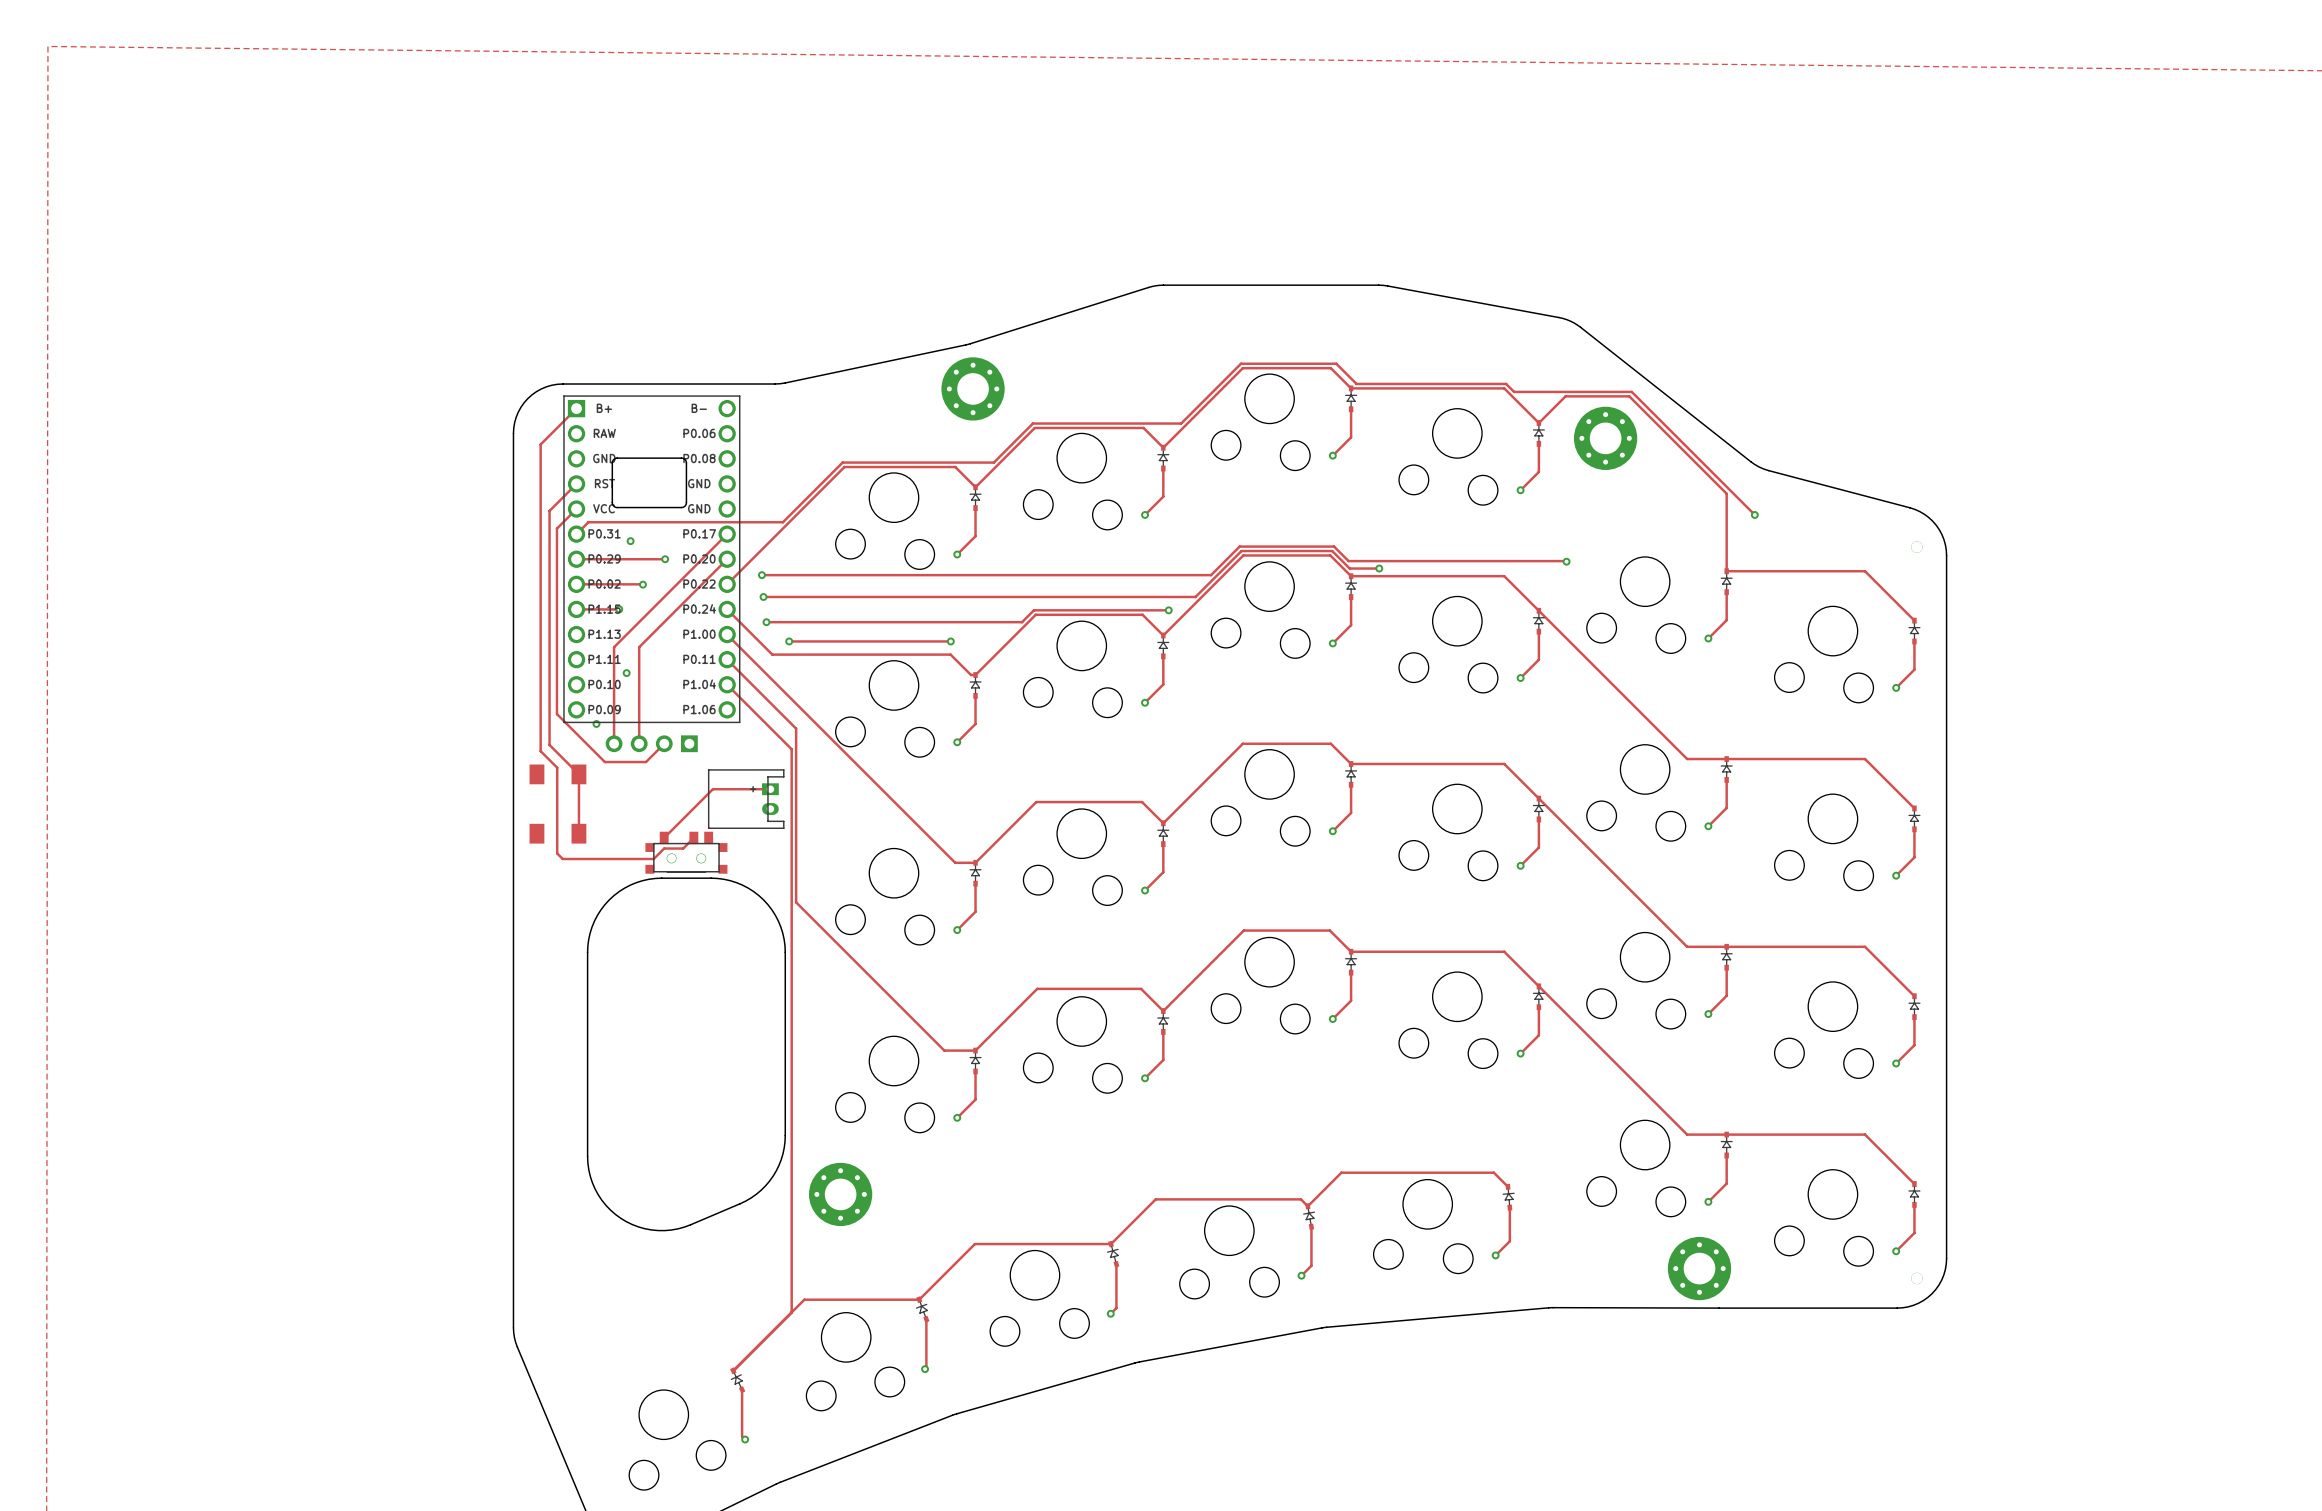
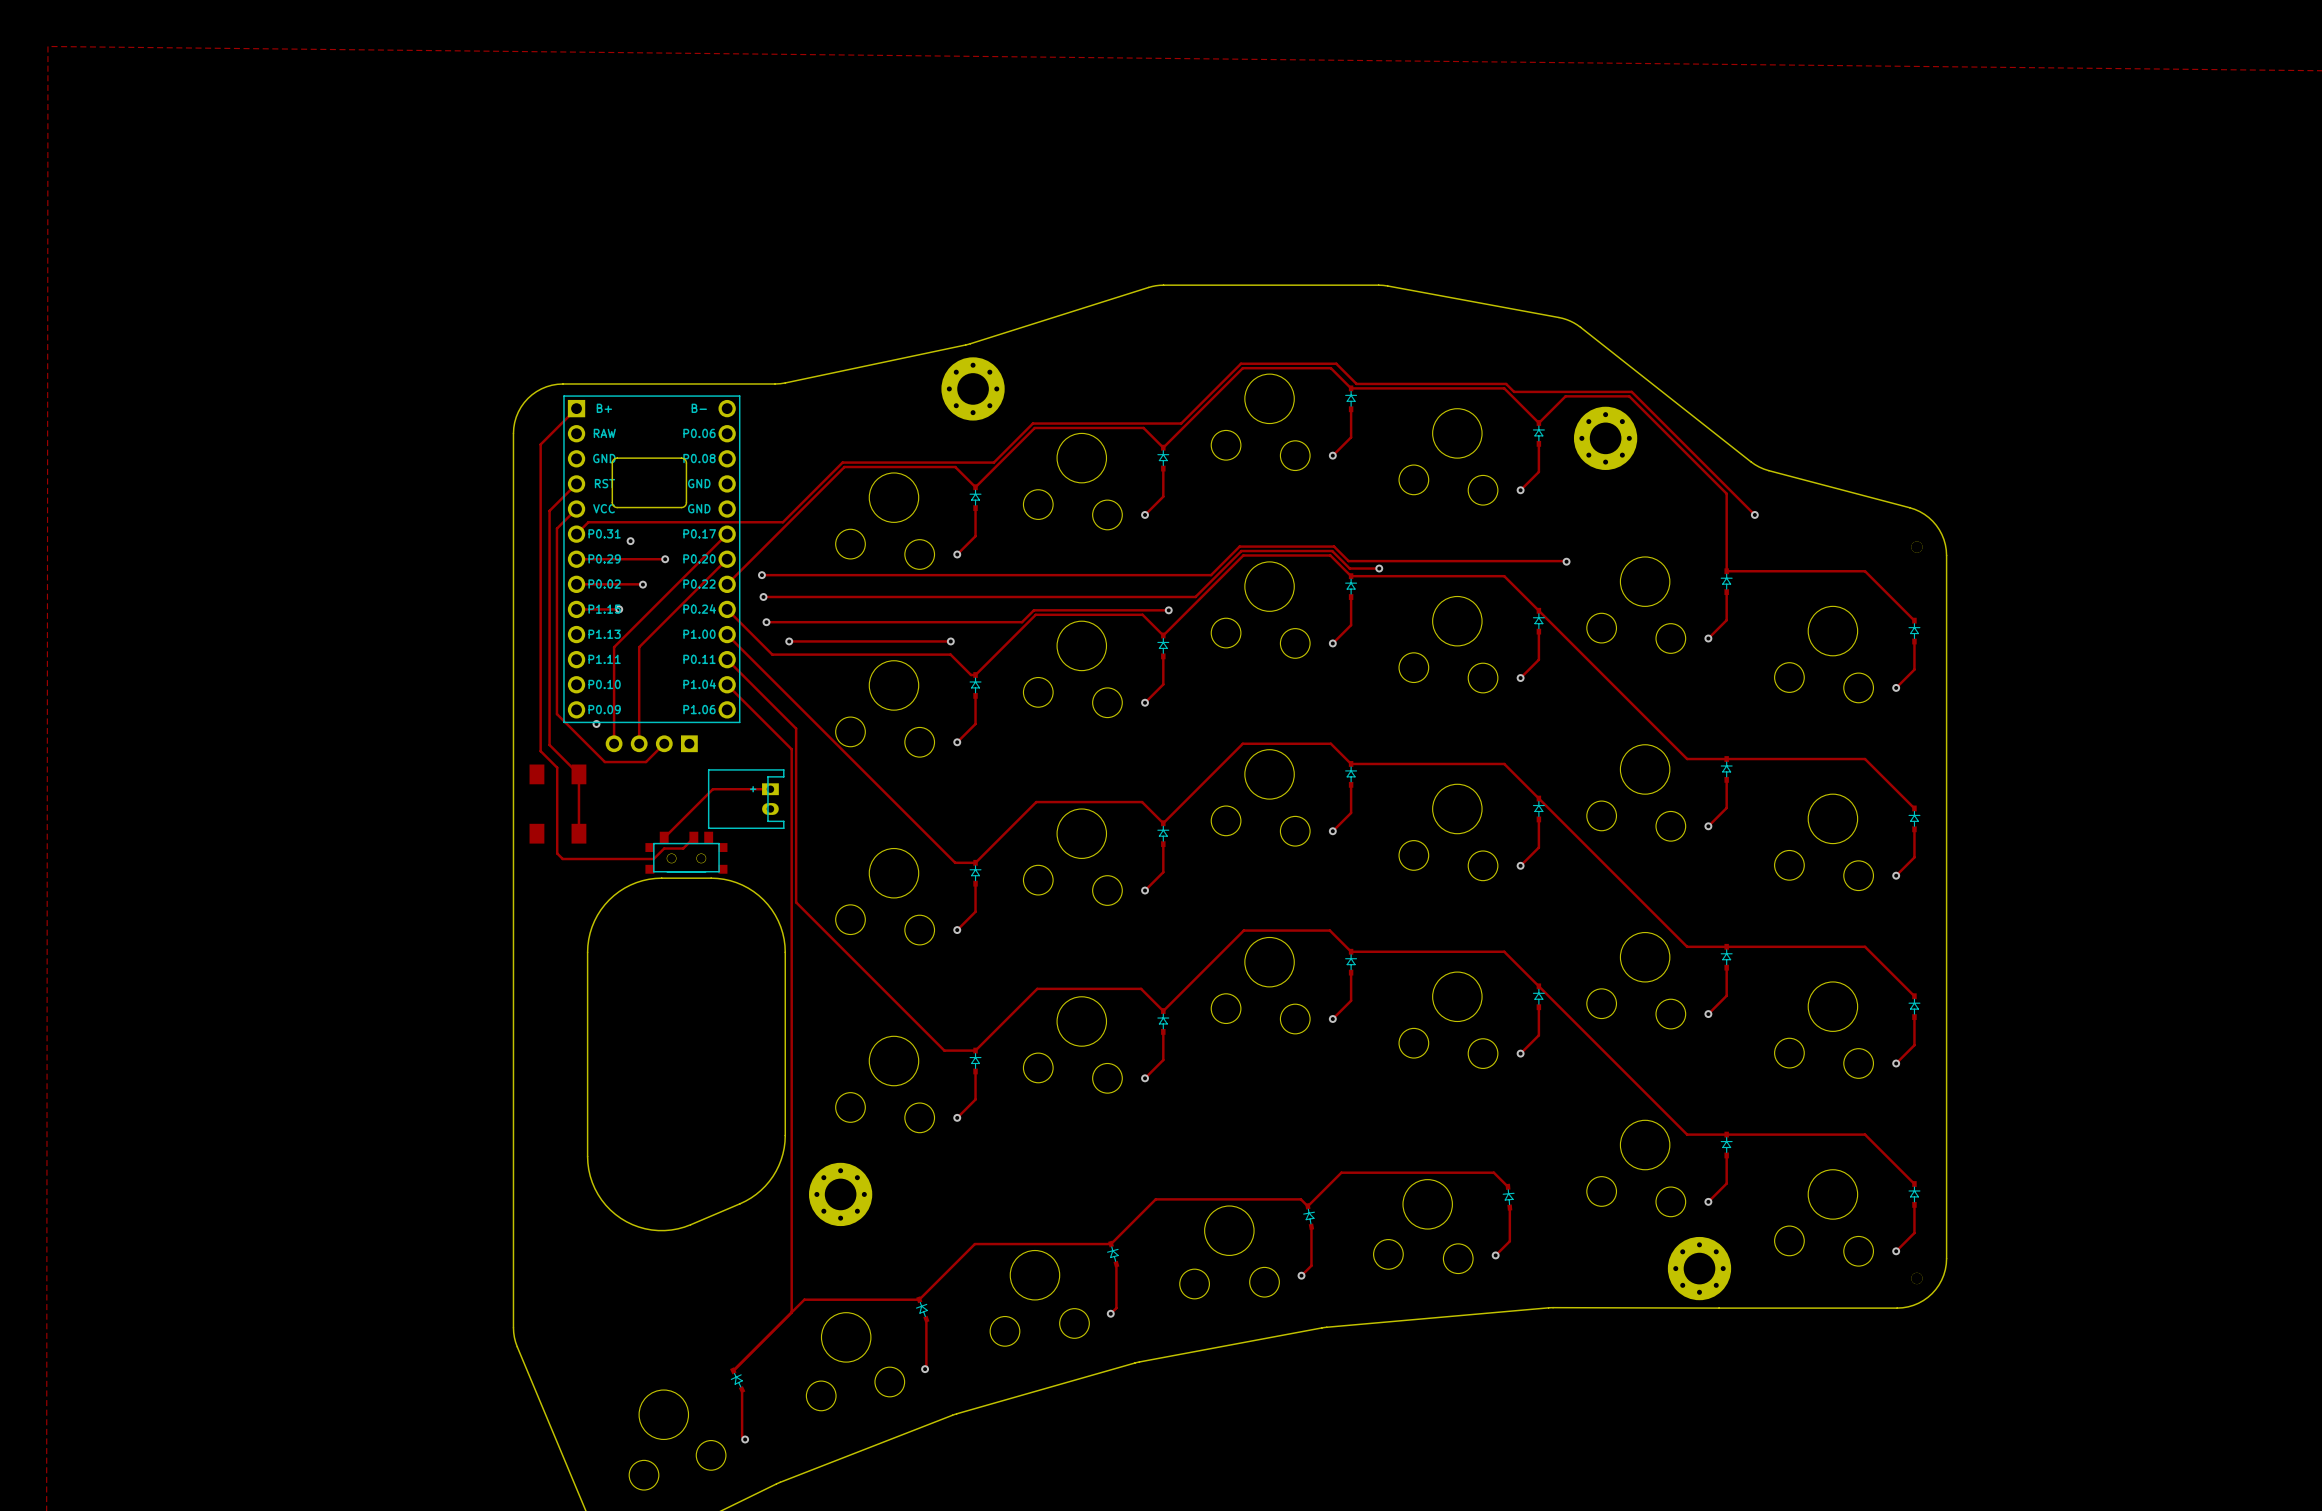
via: (626, 673) -> none

